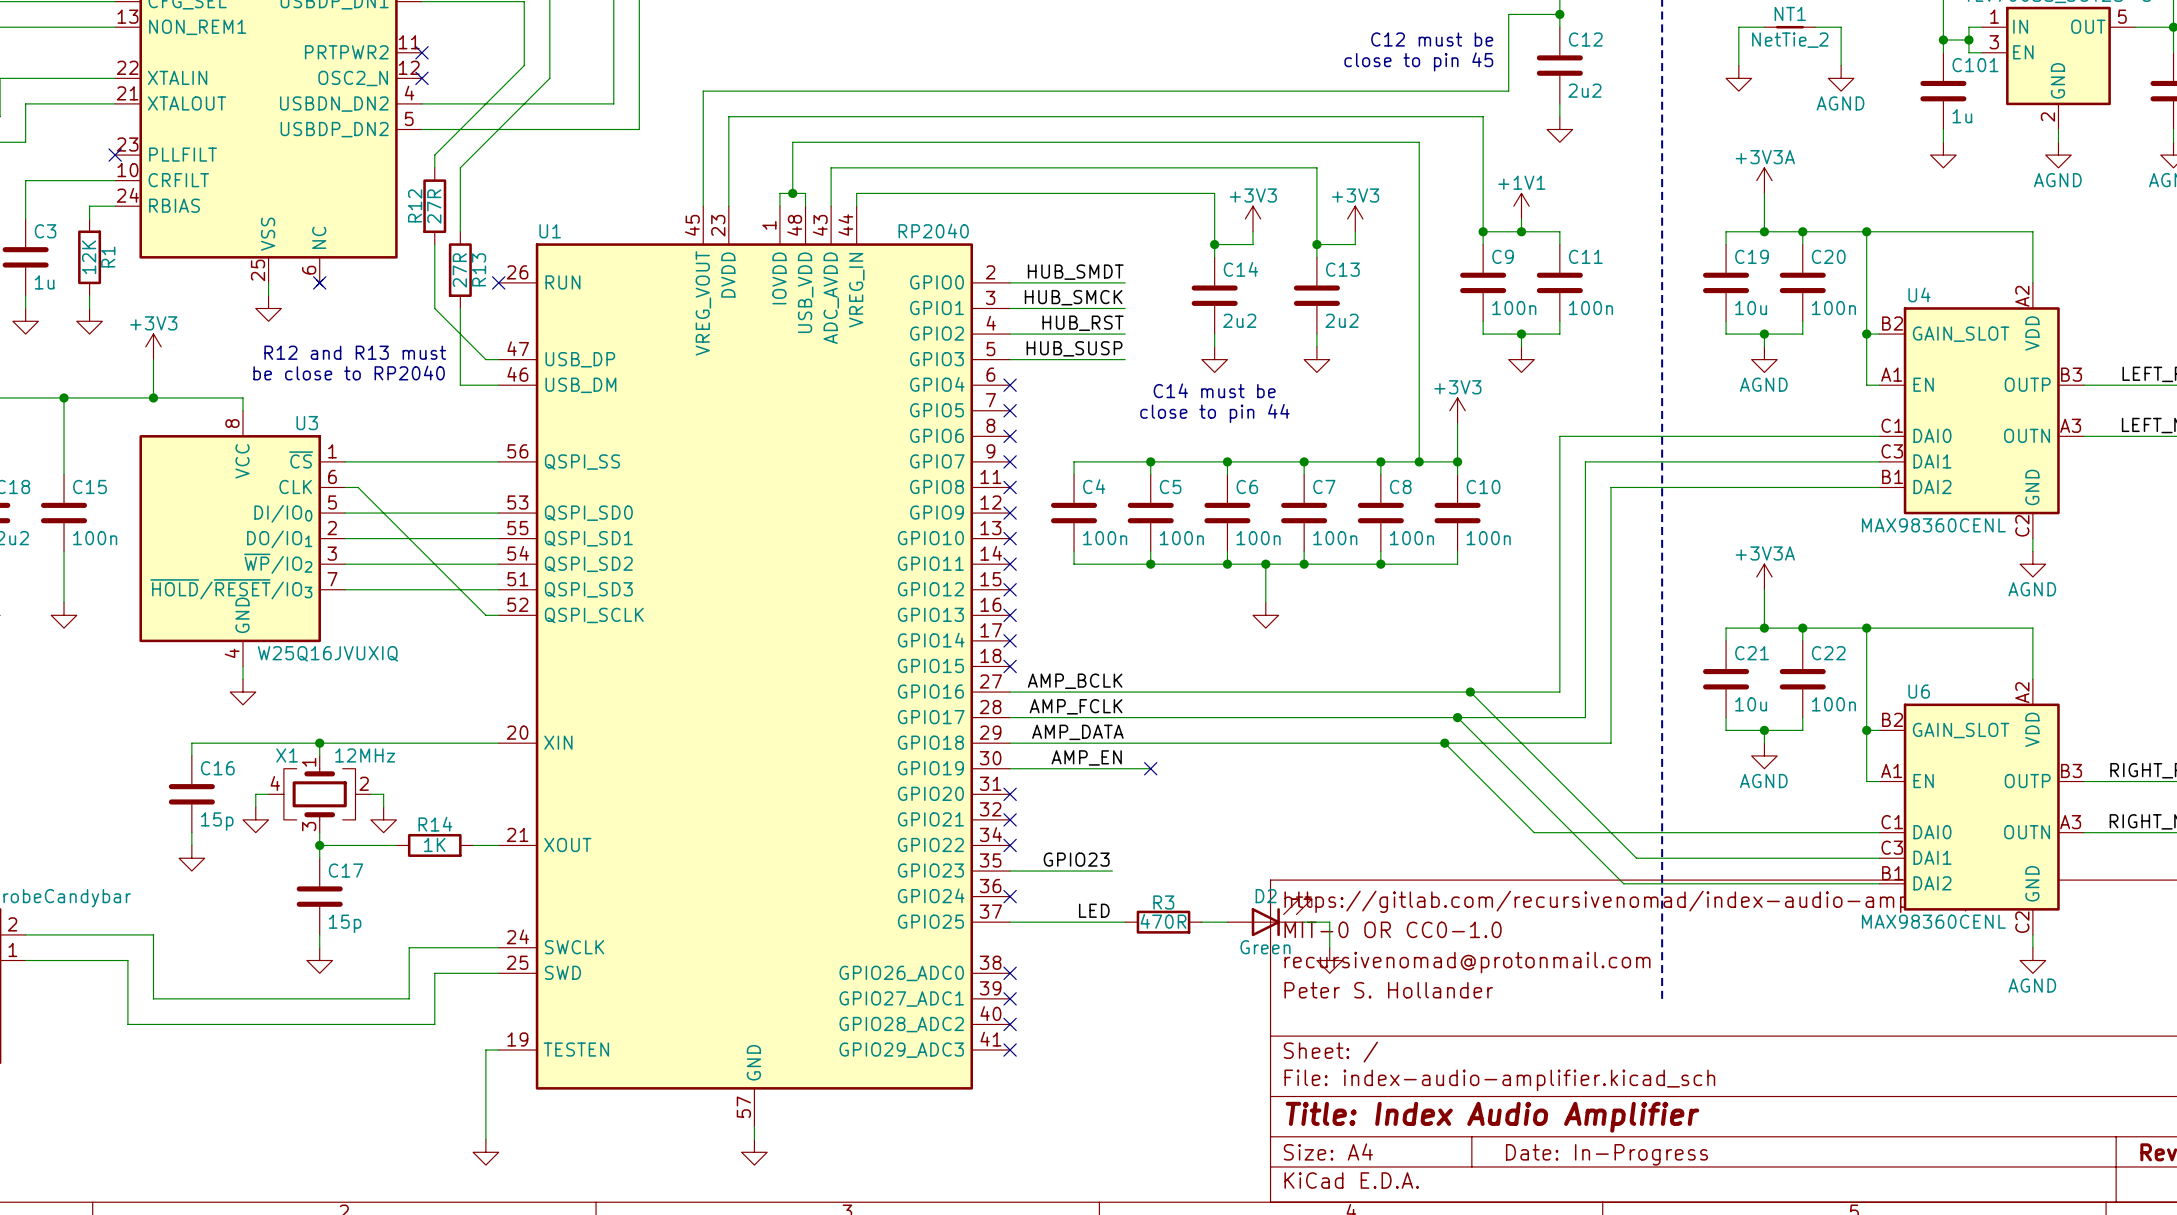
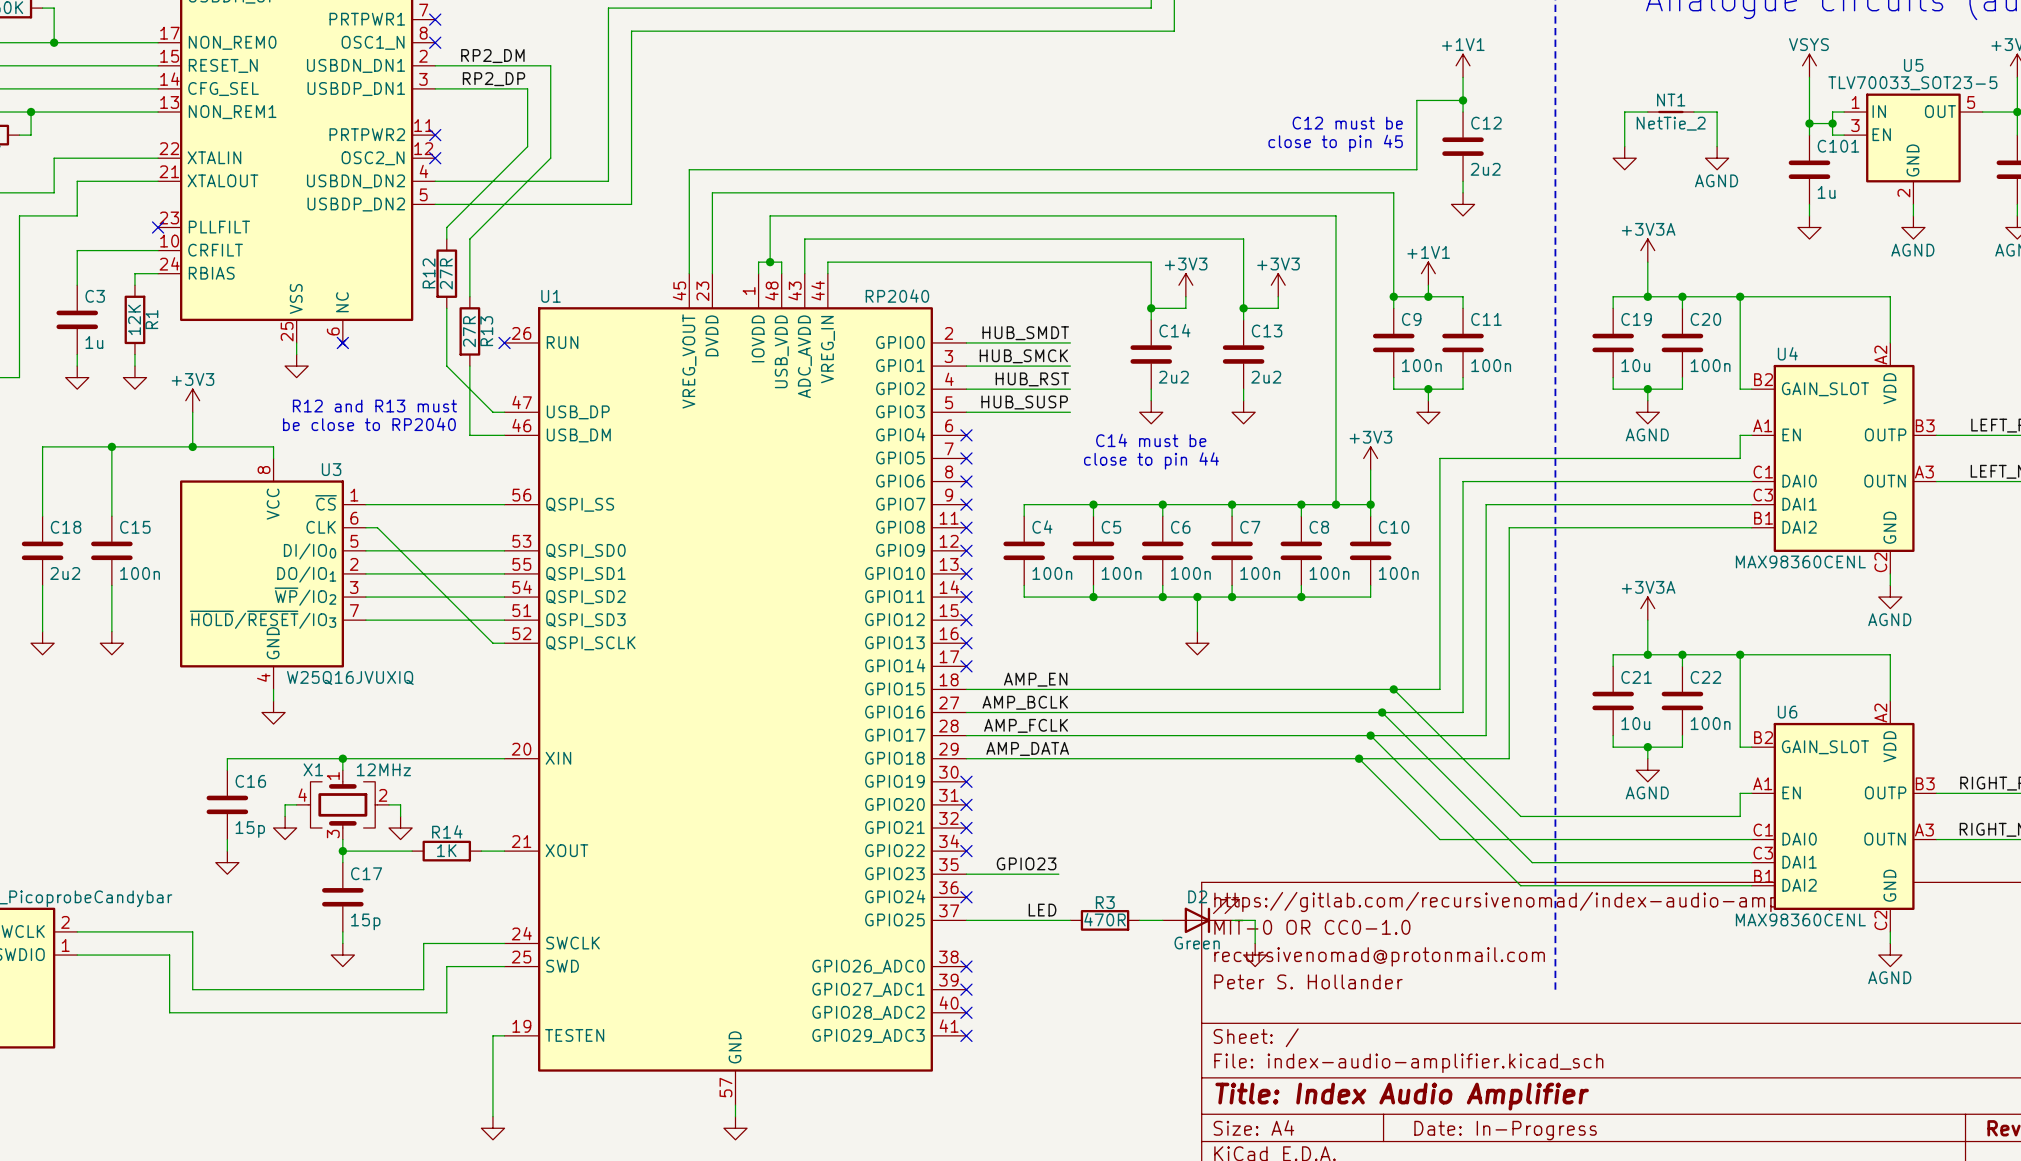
wire: (1866, 334) (1866, 385) -> (966, 689) (1439, 689) (1439, 458) (1740, 458) (1740, 435)
junction: (1866, 334) -> none
no-connect mark: (1010, 666) -> none
junction: none -> (1393, 689)
wire: (1866, 730) (1866, 781) -> (1393, 689) (1520, 816) (1740, 816) (1740, 793)
junction: (1866, 730) -> none
label position: AMP_EN (1086, 757) -> AMP_EN (1035, 679)
wire: (1010, 768) (1150, 768) -> none
no-connect mark: none -> (966, 781)
no-connect mark: (1150, 768) -> none

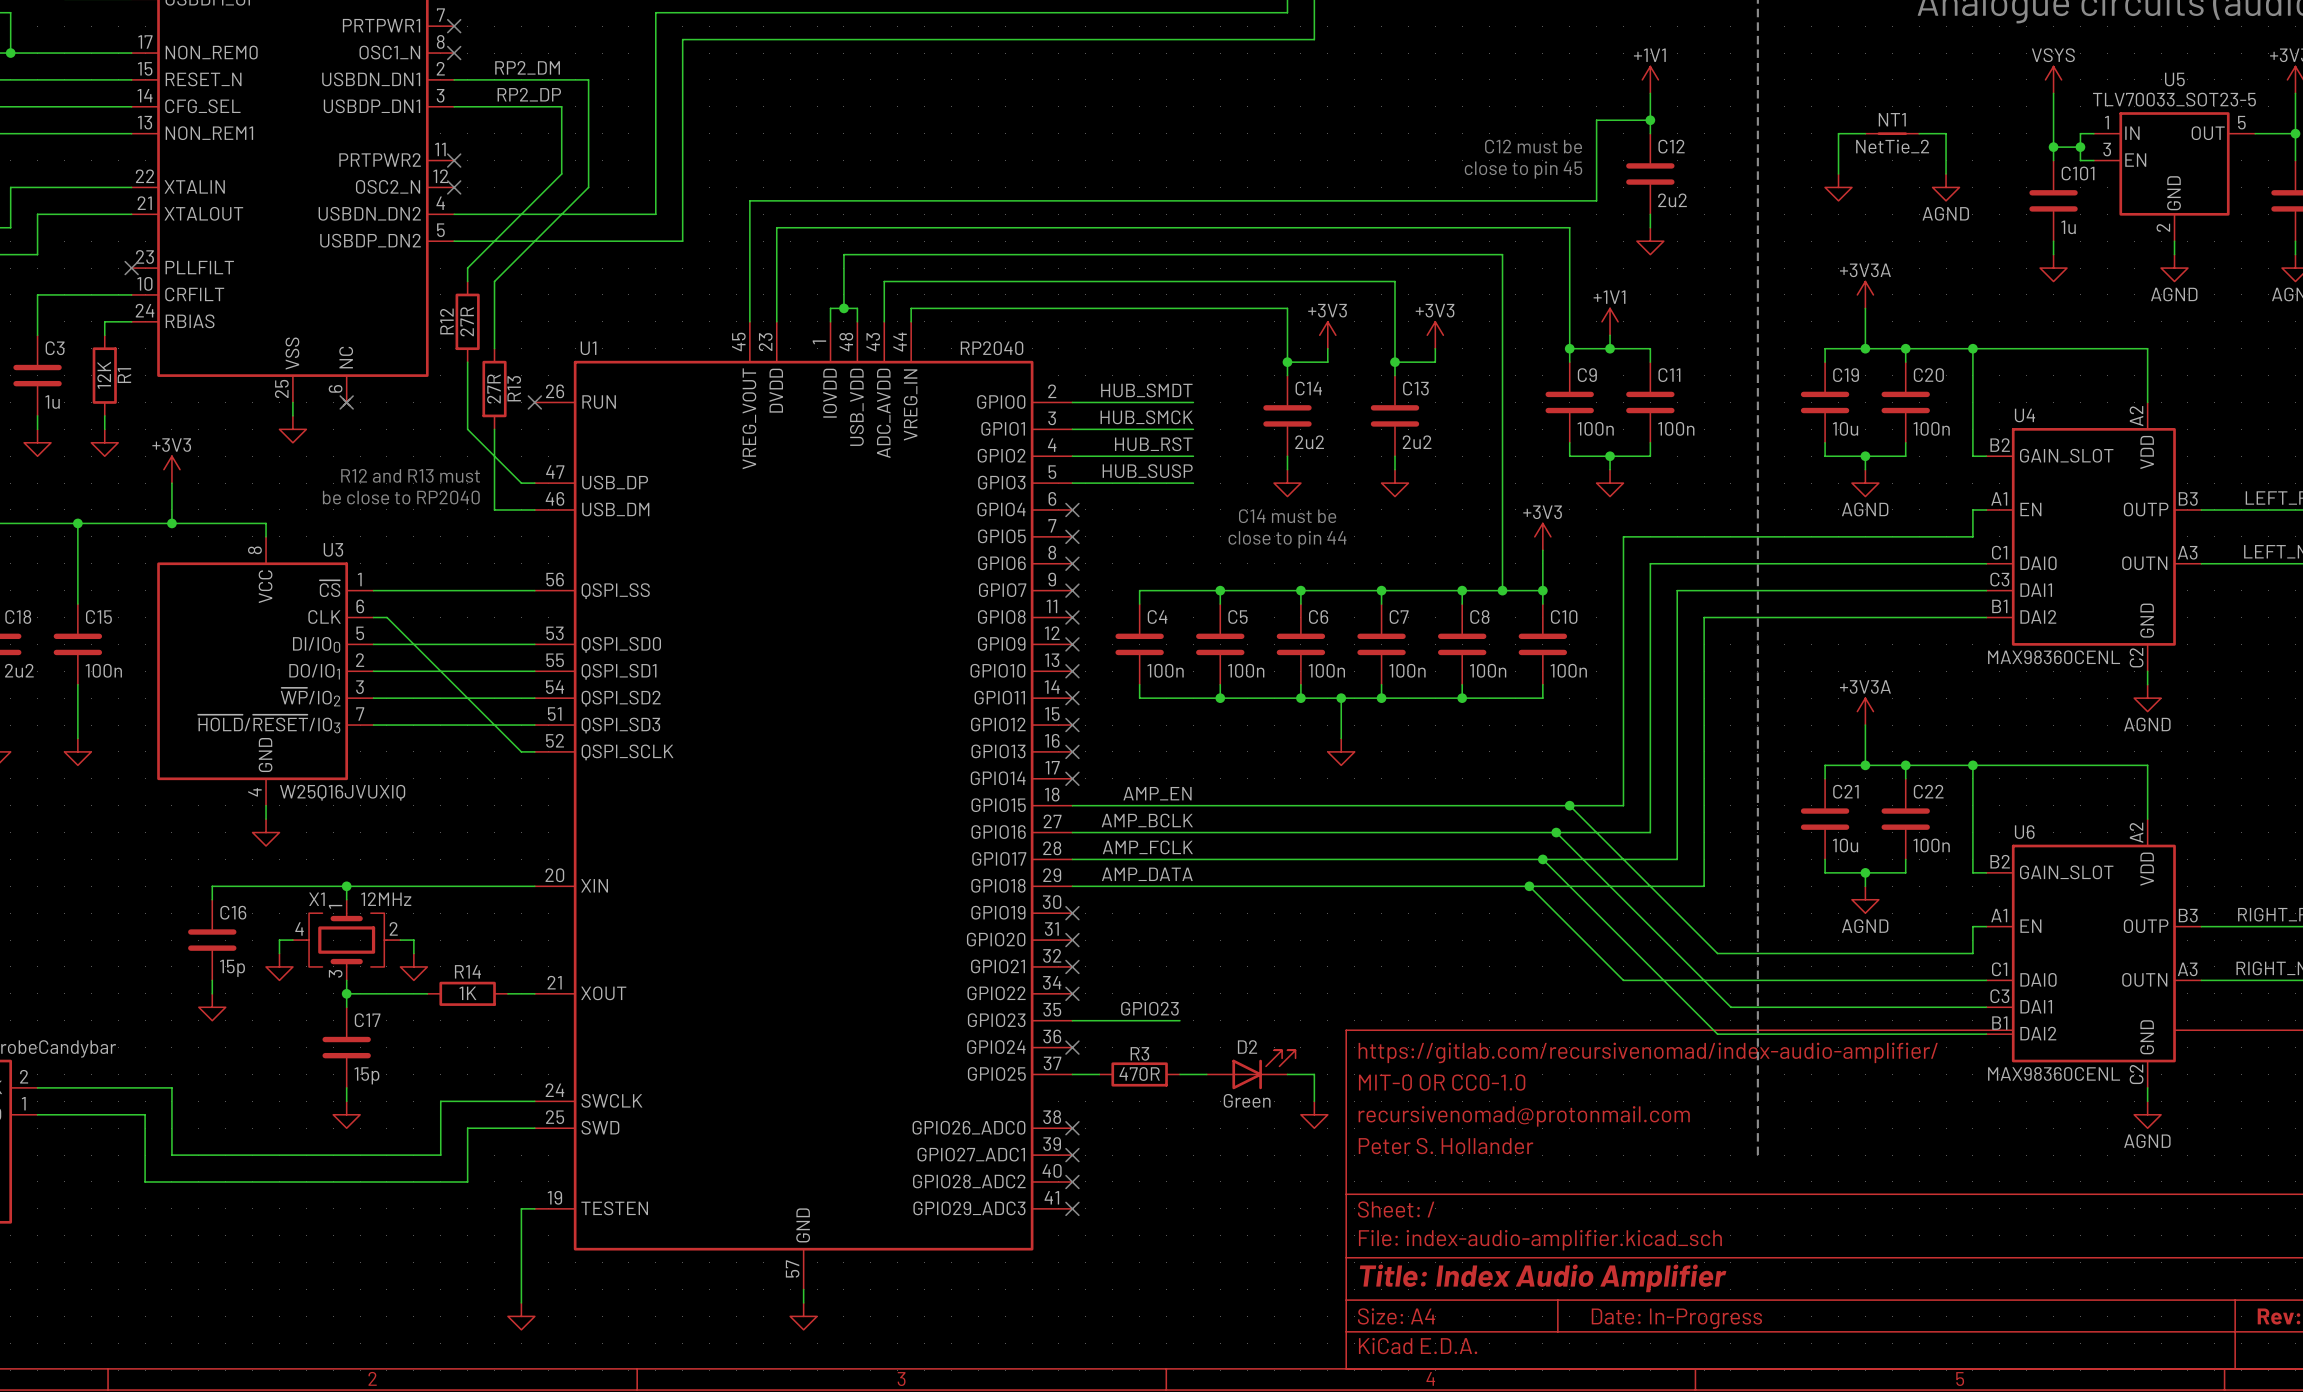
label: LED (1042, 910) -> none
D2 position: (1200, 916) -> (1251, 1069)
R3 position: (1105, 920) -> (1139, 1074)
wire: none -> (1300, 1074) (1314, 1074) (1314, 1101)
wire: (1232, 920) (1255, 920) (1255, 943) -> none
power symbol position: (1255, 955) -> (1314, 1114)

